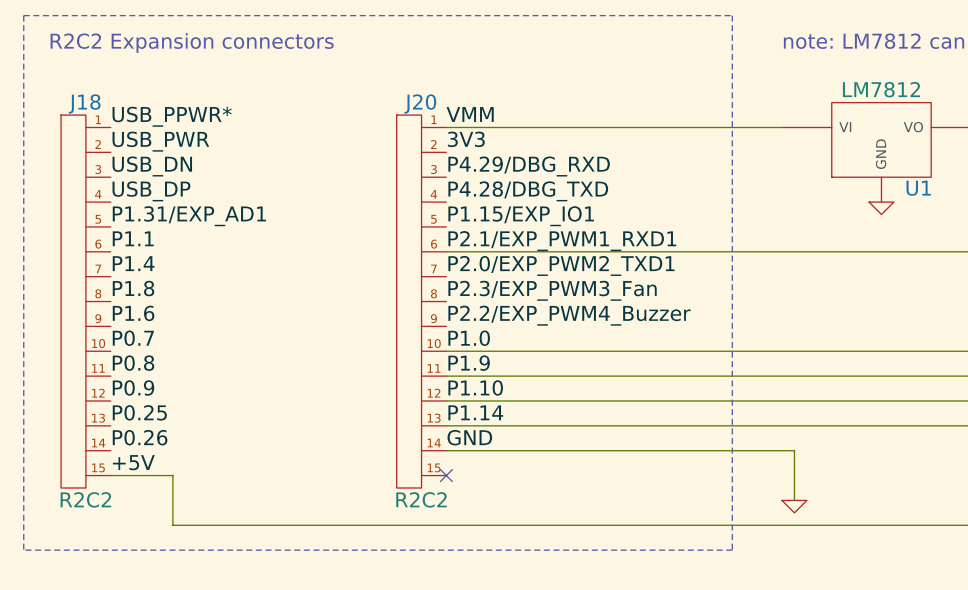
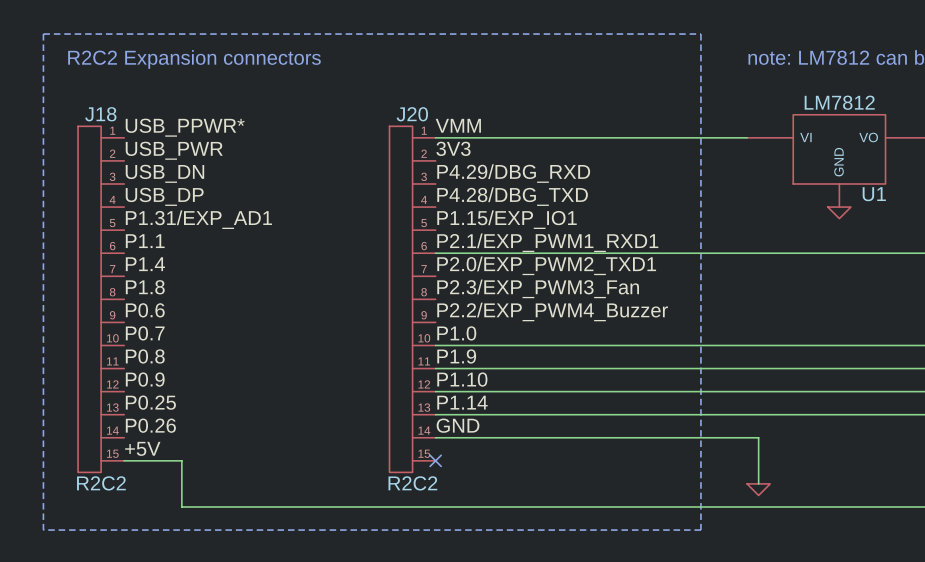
label: P1.6 (133, 313) -> P0.6 (145, 310)

